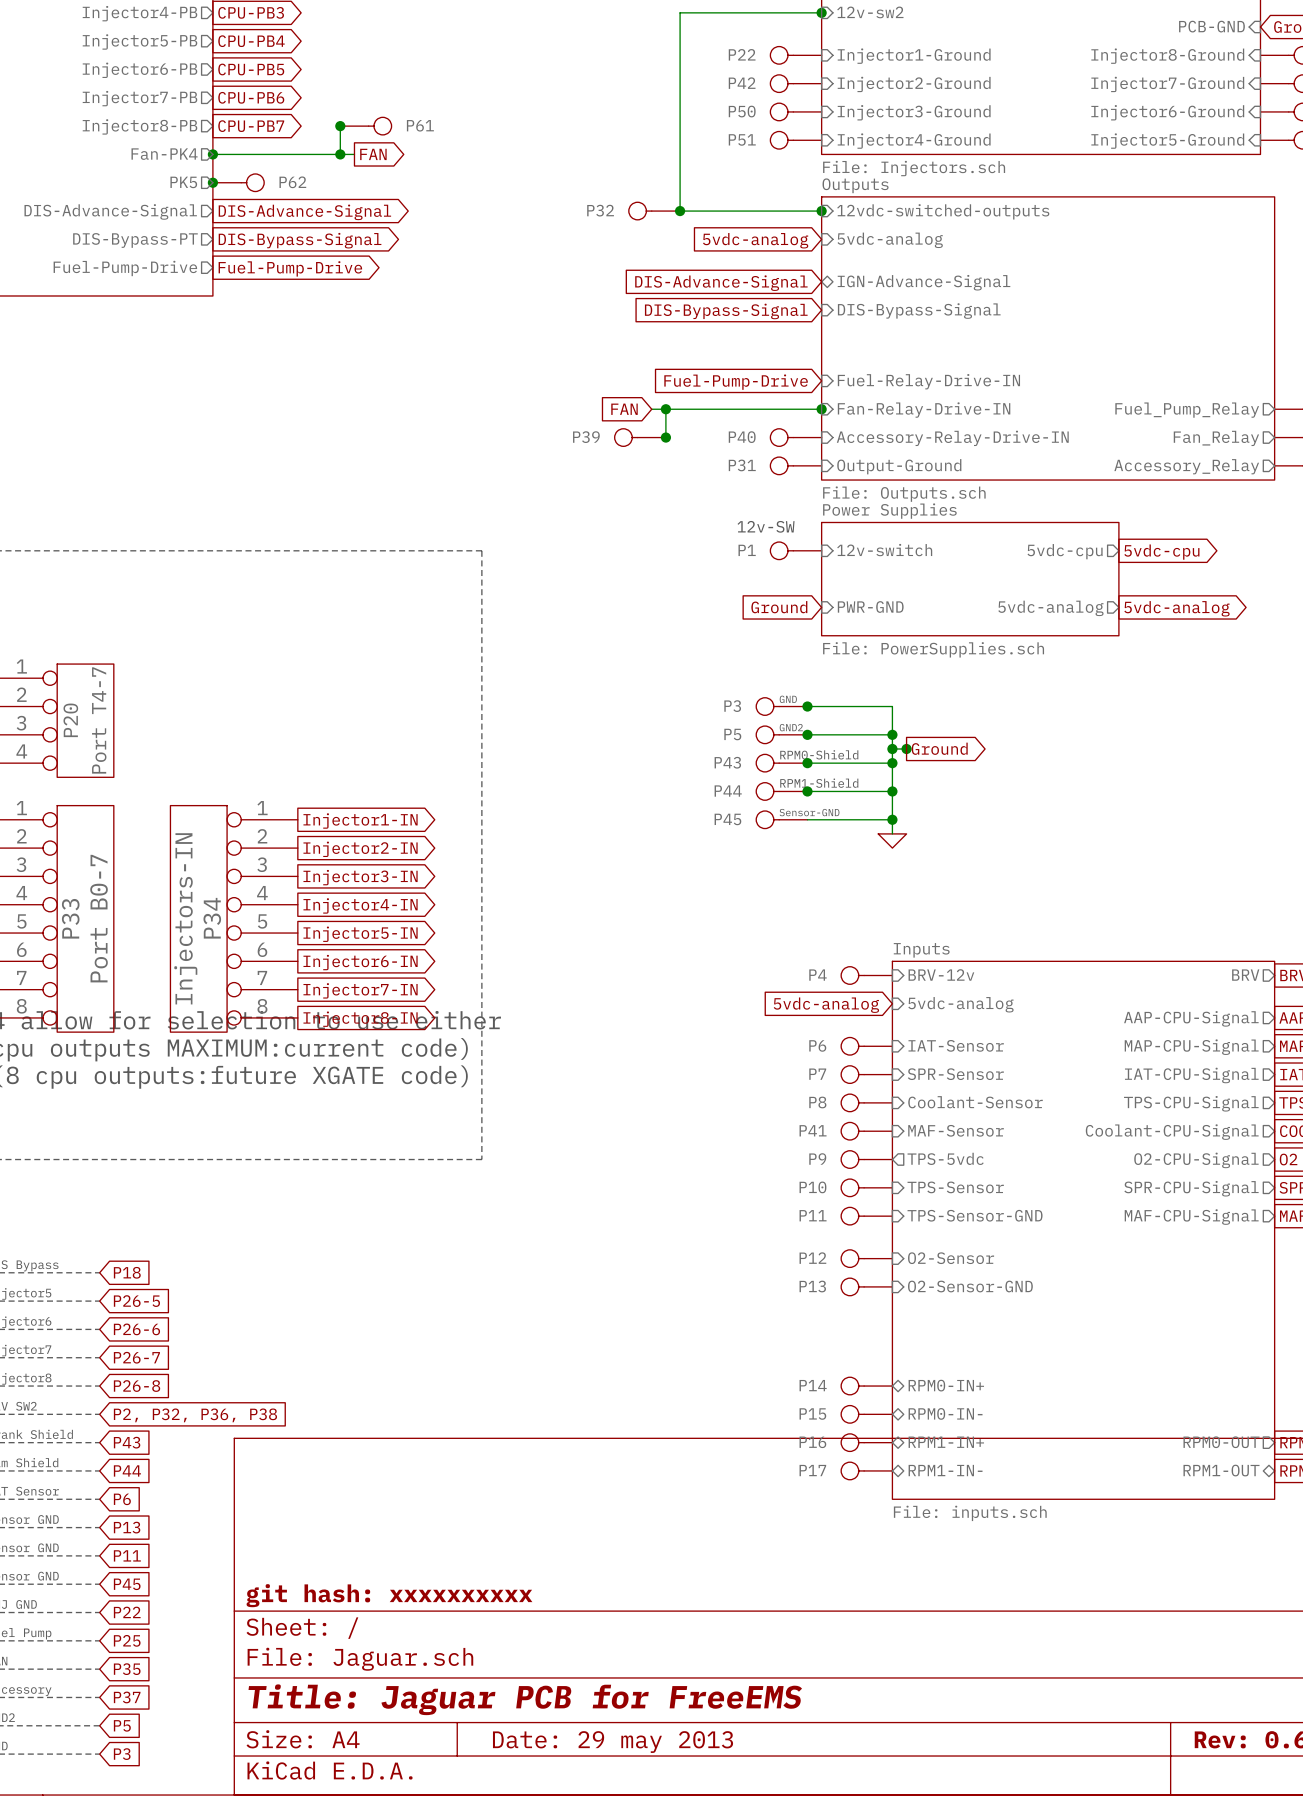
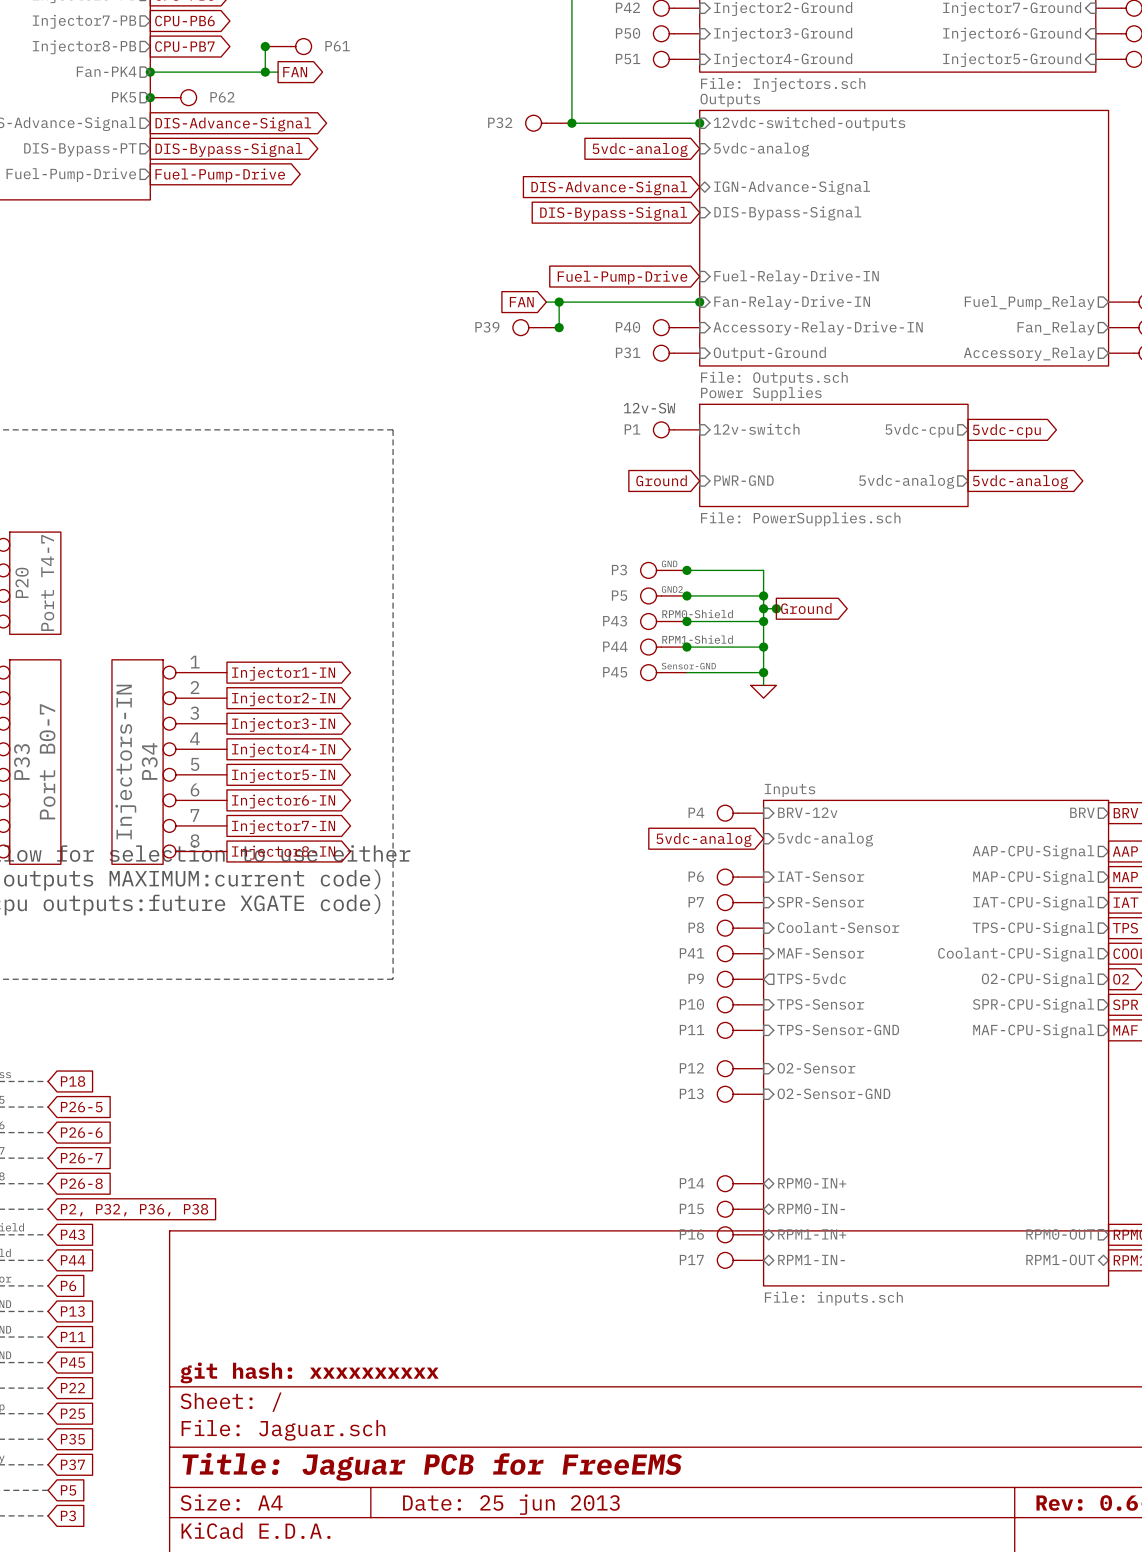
title block: Date: 29 may 2013 (613, 1742) -> Date: 25 jun 2013 (511, 1504)

